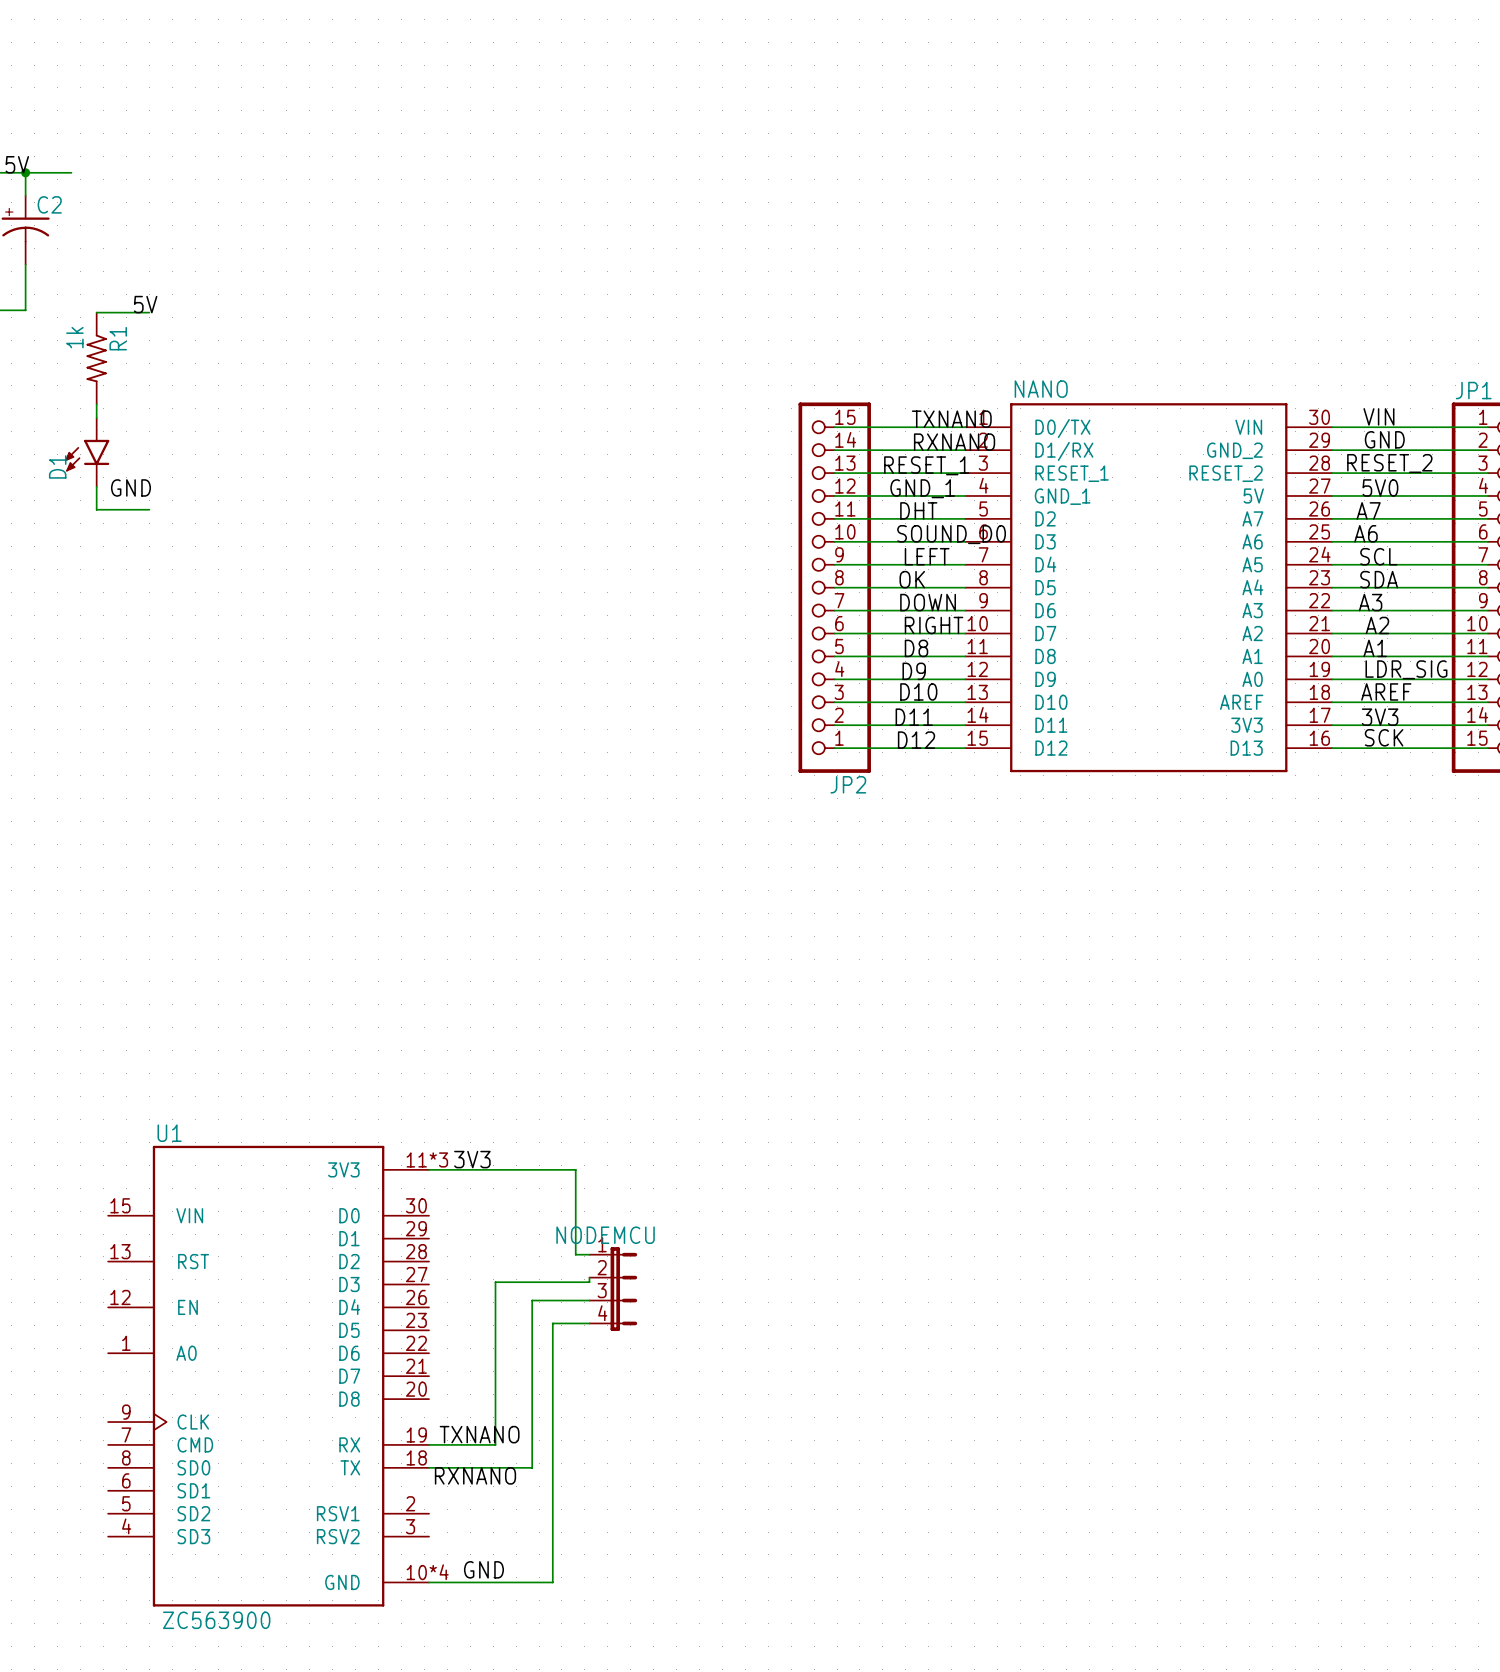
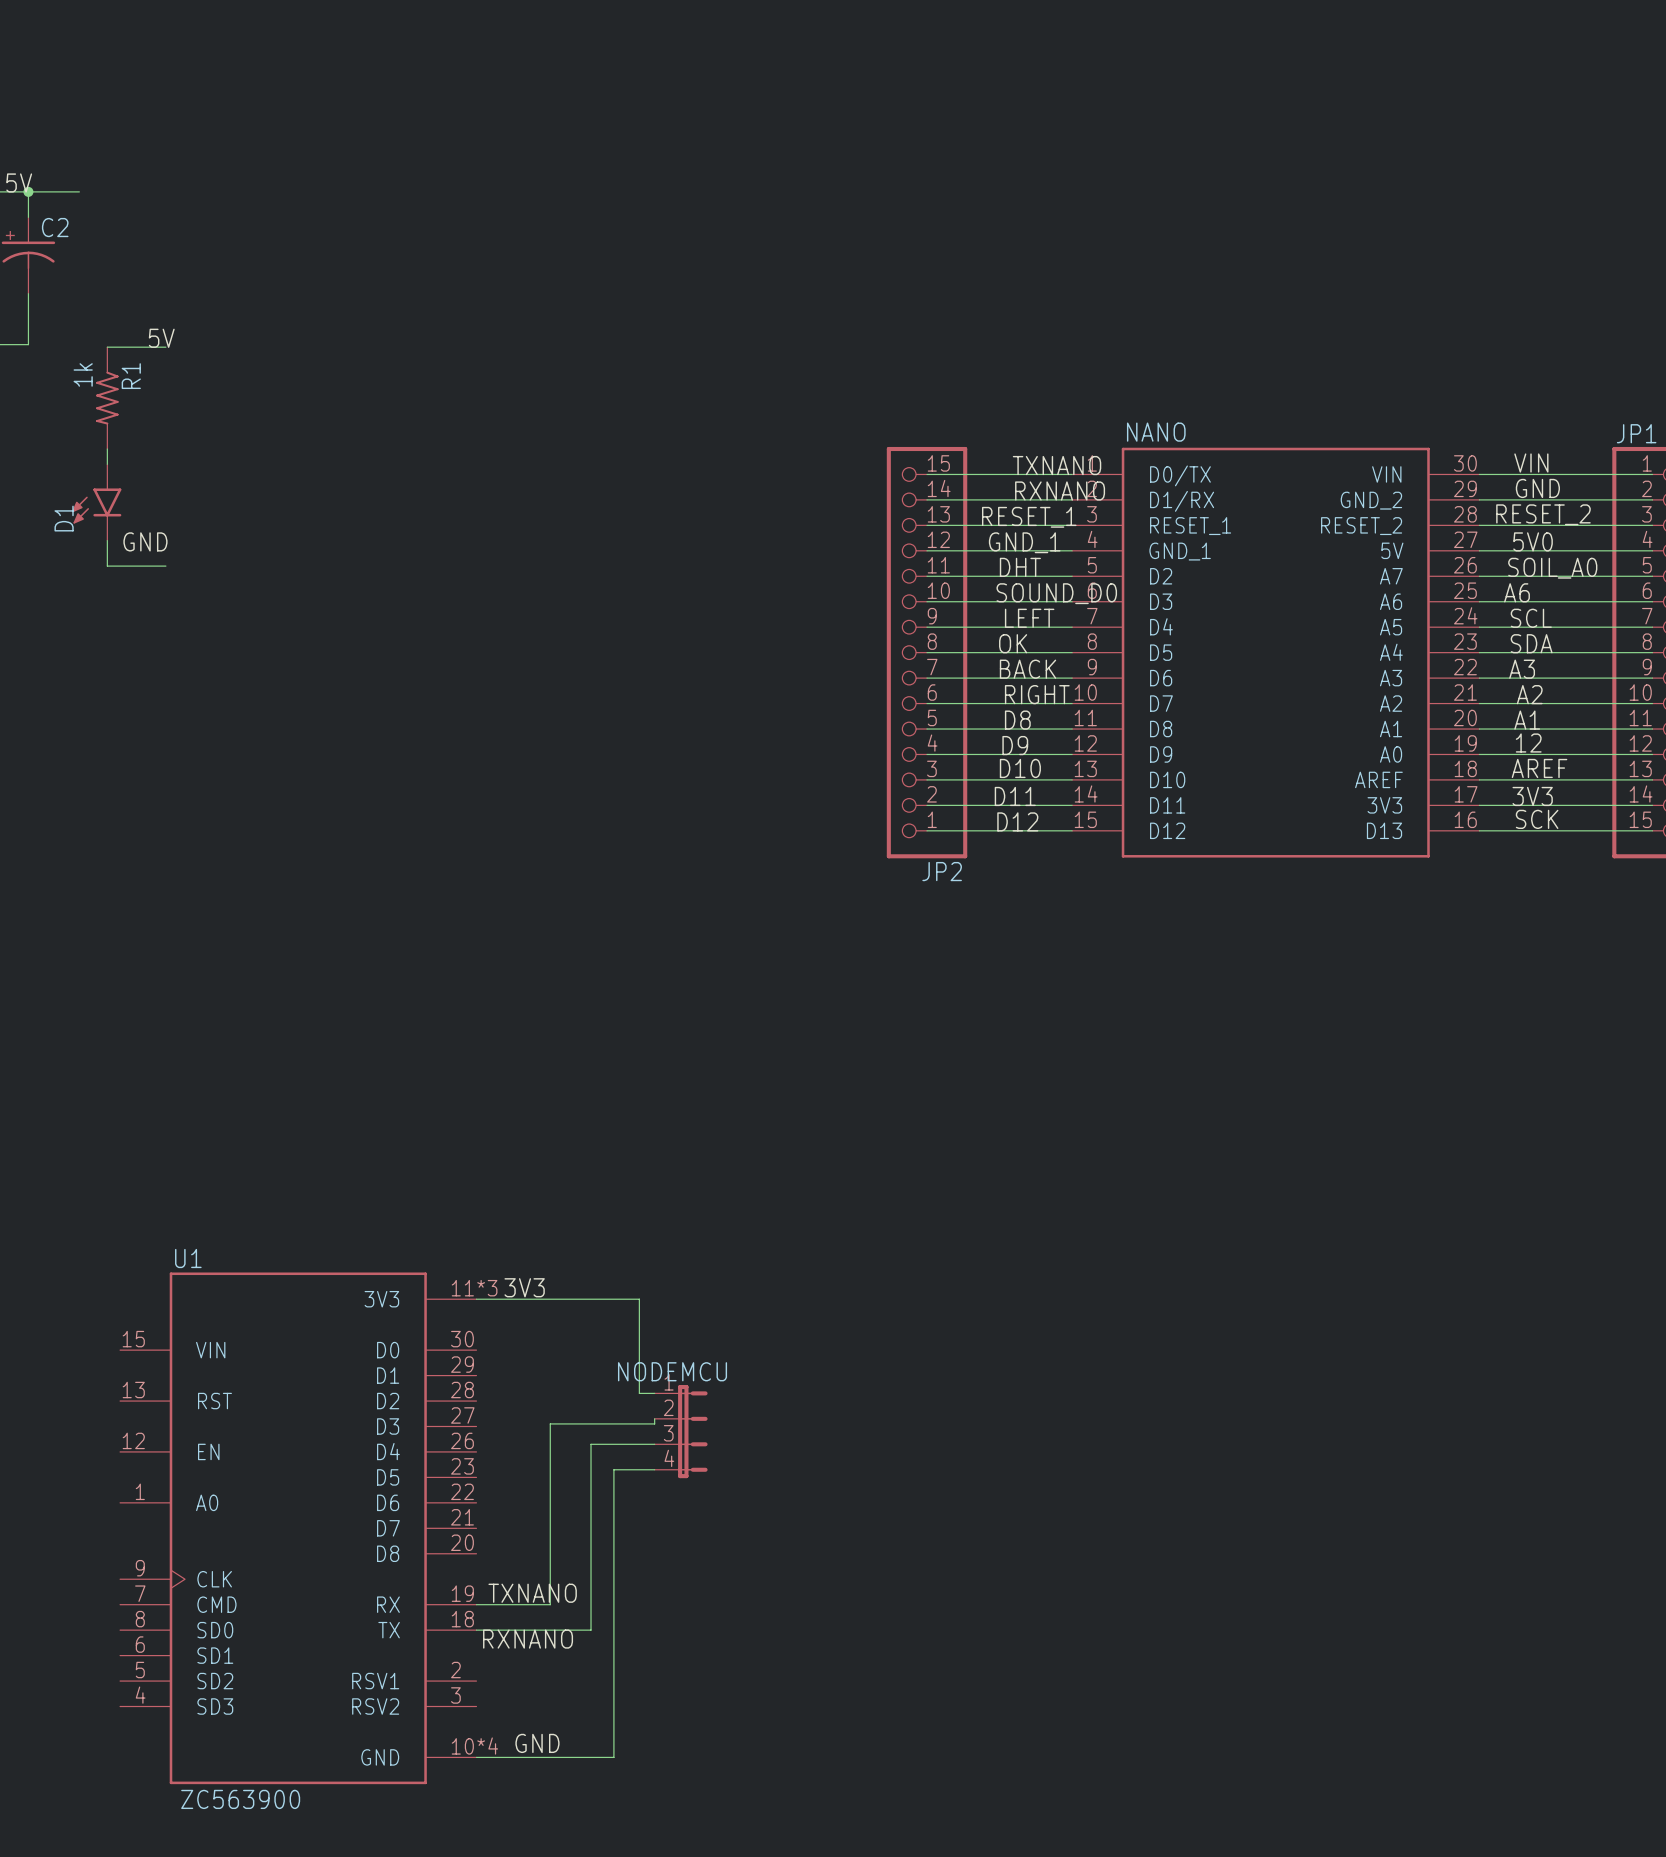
label: A7 (1368, 510) -> SOIL_A0 (1552, 568)
label: DOWN (928, 602) -> BACK (1028, 669)
label: LDR_SIG (1406, 669) -> 12 (1528, 743)

